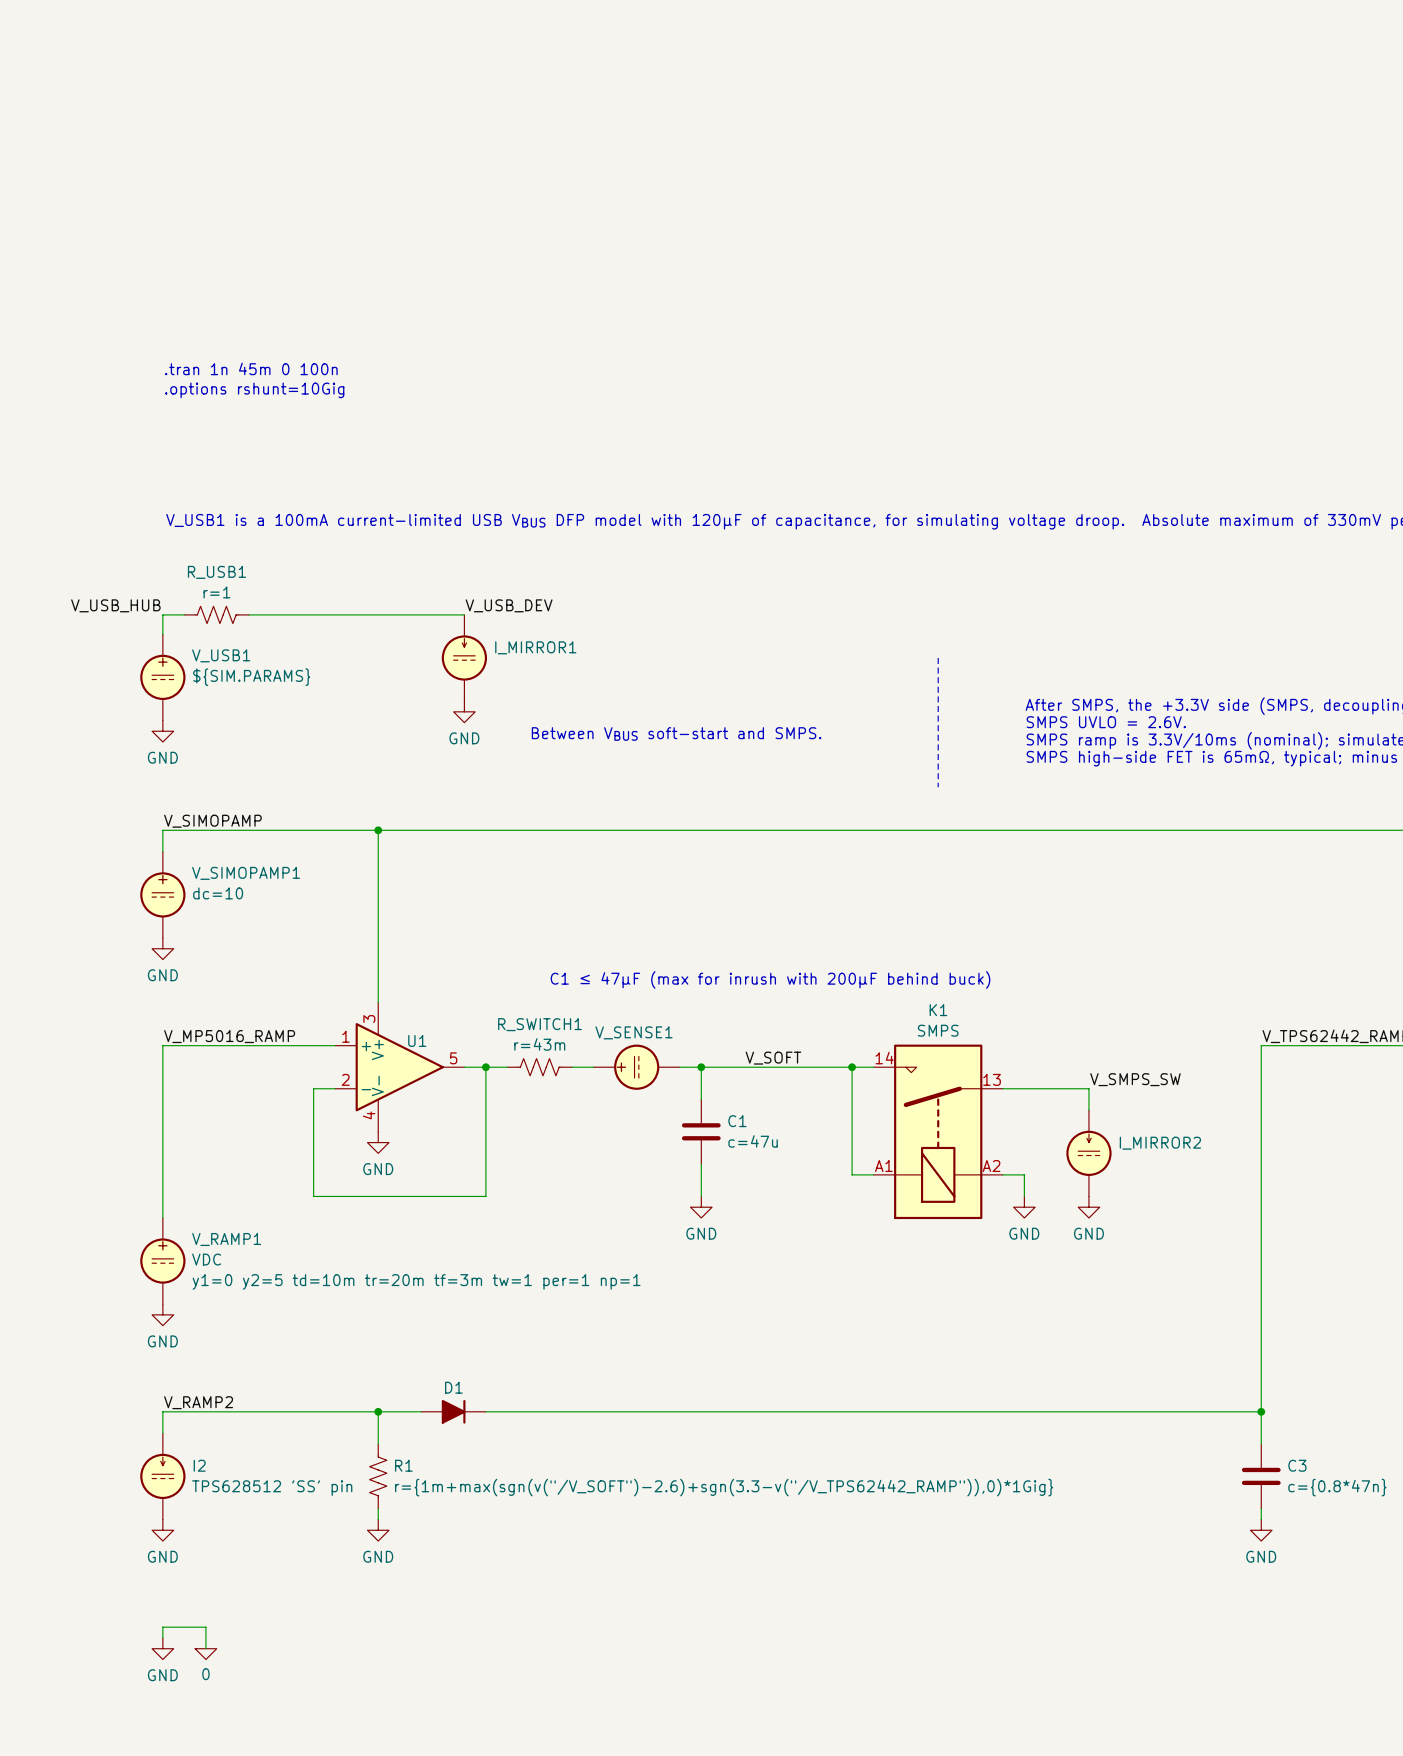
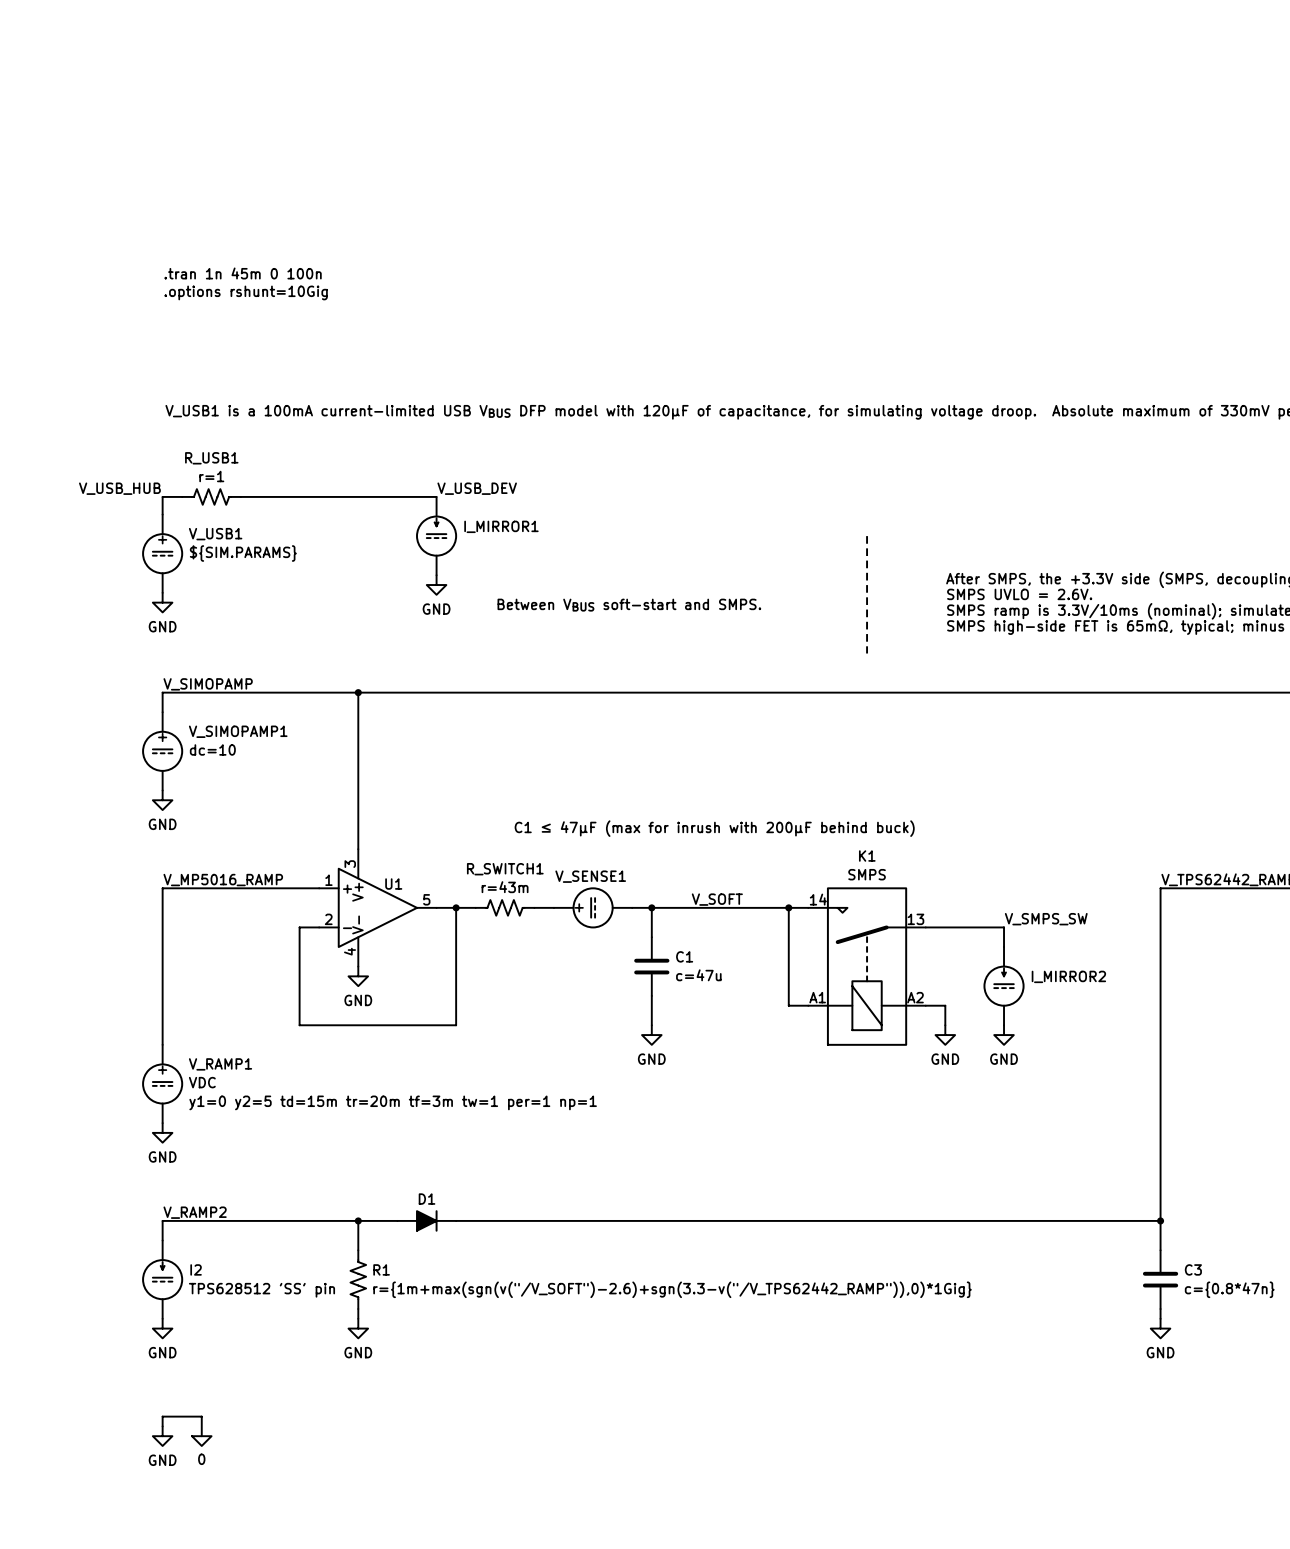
V_RAMP1 text: y1=0 y2=5 td=10m tr=20m tf=3m tw=1 per=1 np=1 (416, 1281) -> y1=0 y2=5 td=15m tr=20m tf=3m tw=1 per=1 np=1 (393, 1102)

